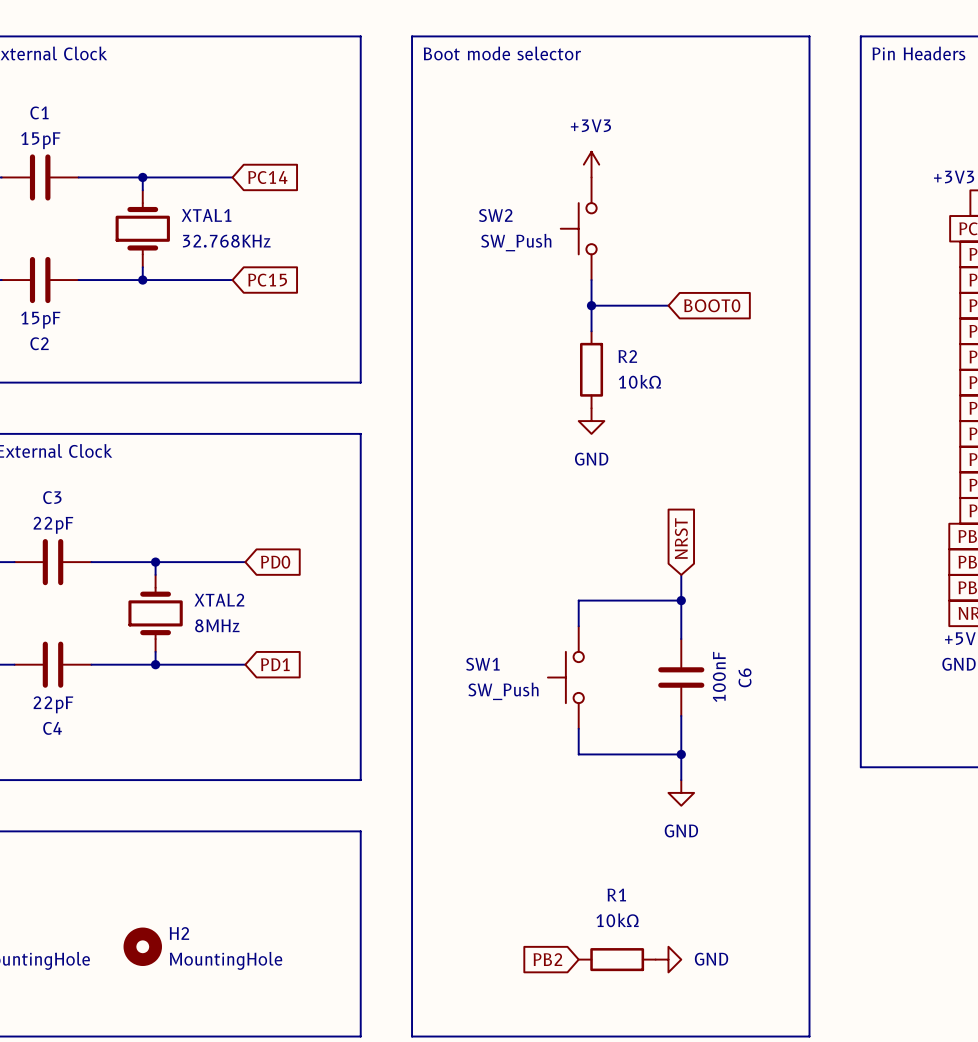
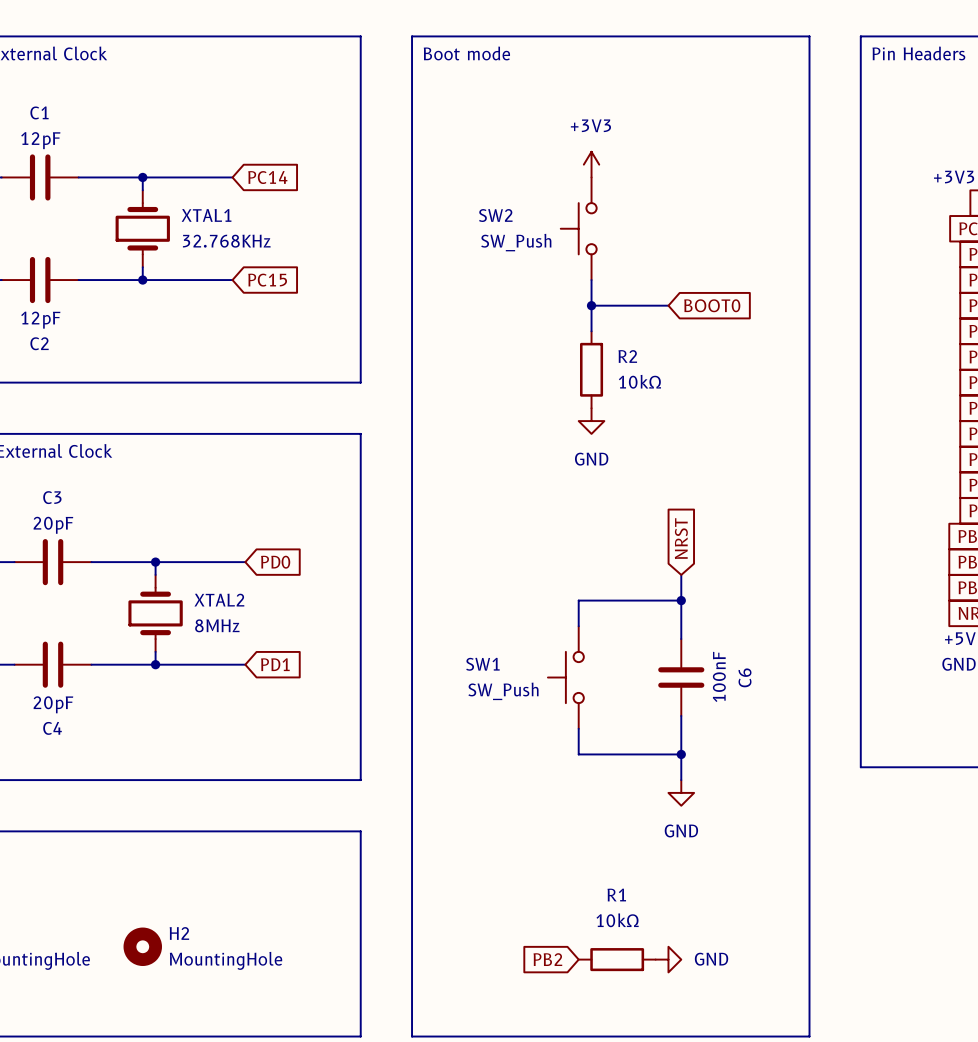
text: Boot mode selector (502, 53) -> Boot mode (466, 53)
C1 value: 15pF (40, 140) -> 12pF (40, 140)
C2 value: 15pF (40, 320) -> 12pF (40, 320)
C3 value: 22pF (53, 525) -> 20pF (53, 525)
C4 value: 22pF (53, 704) -> 20pF (53, 704)

